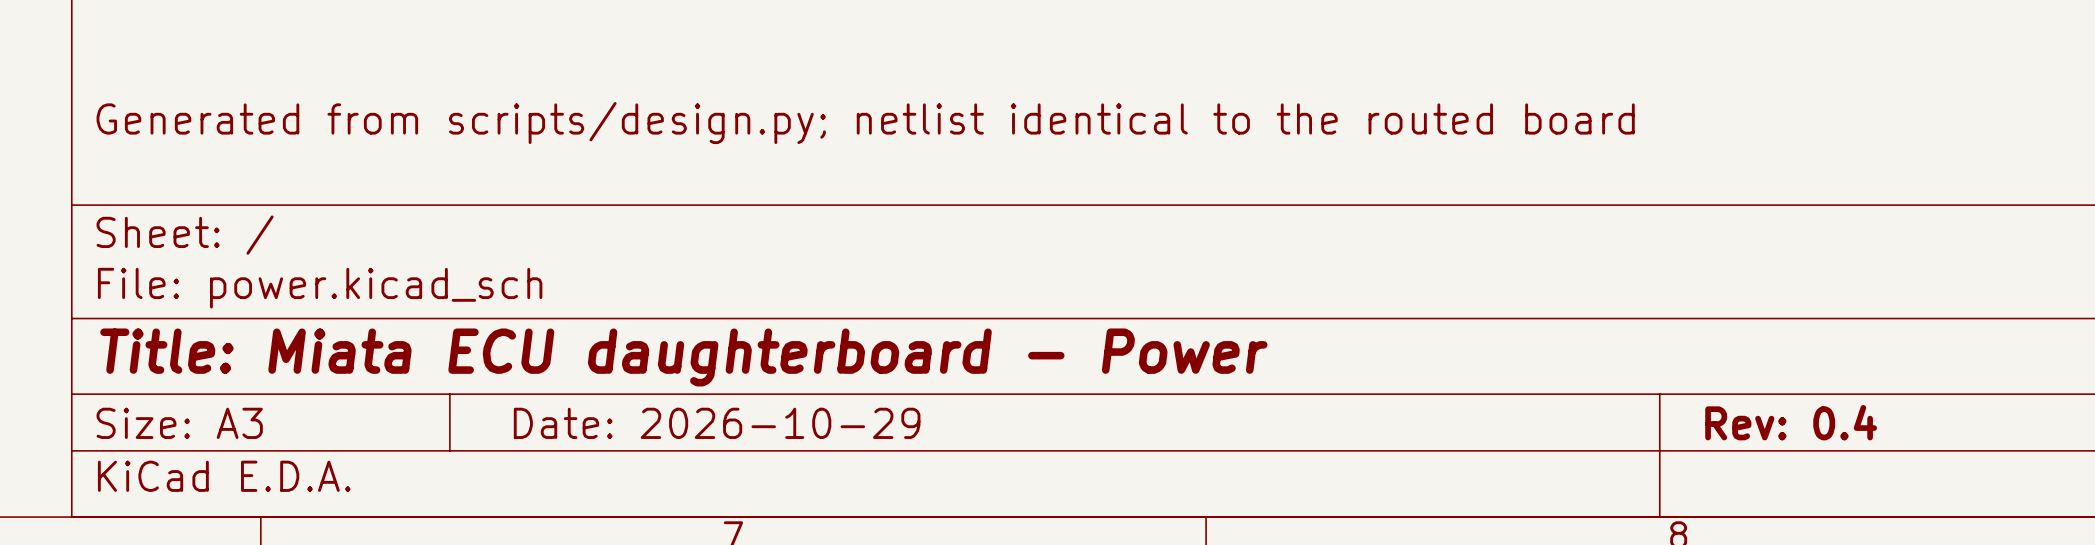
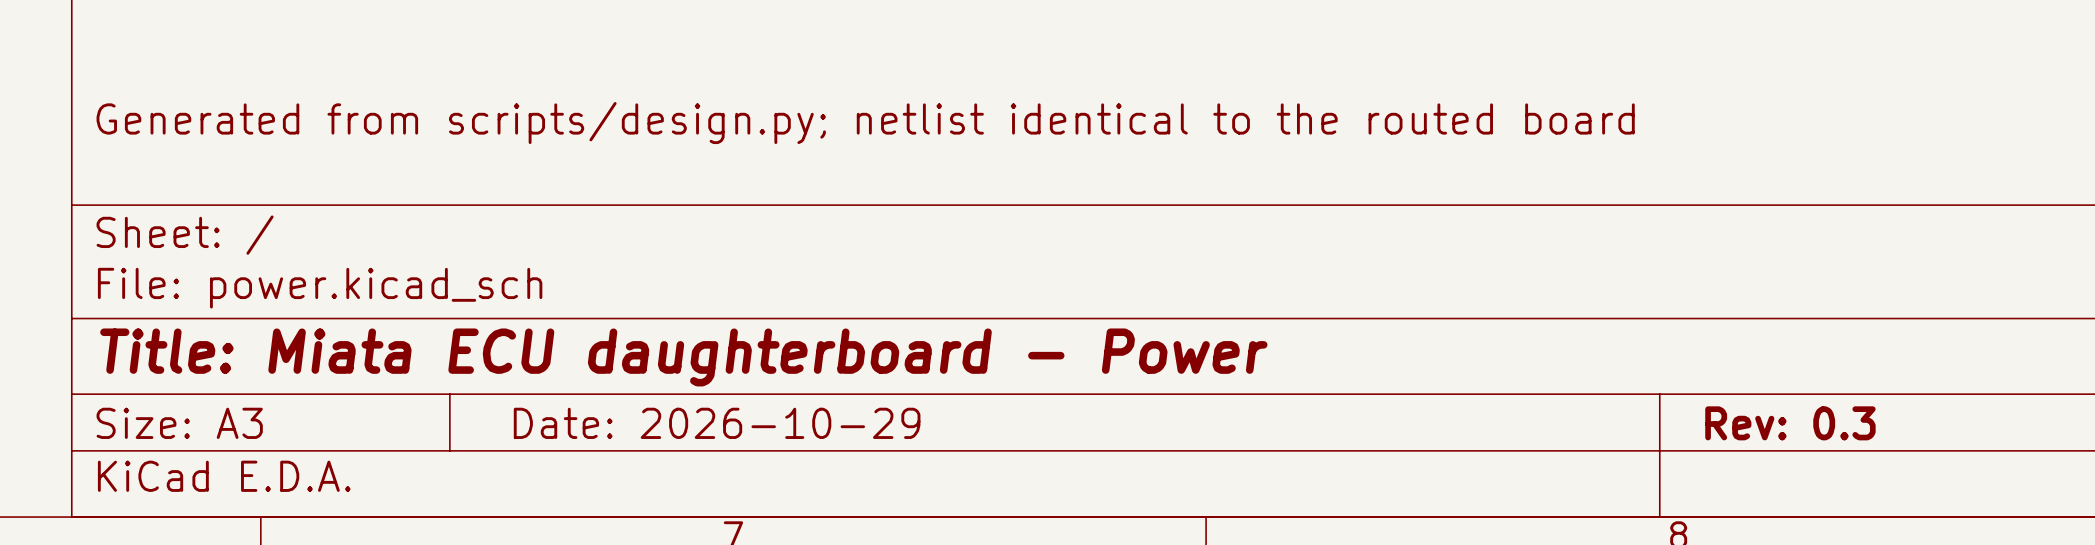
title block: Rev: 0.4 (1791, 422) -> Rev: 0.3 (1790, 423)

